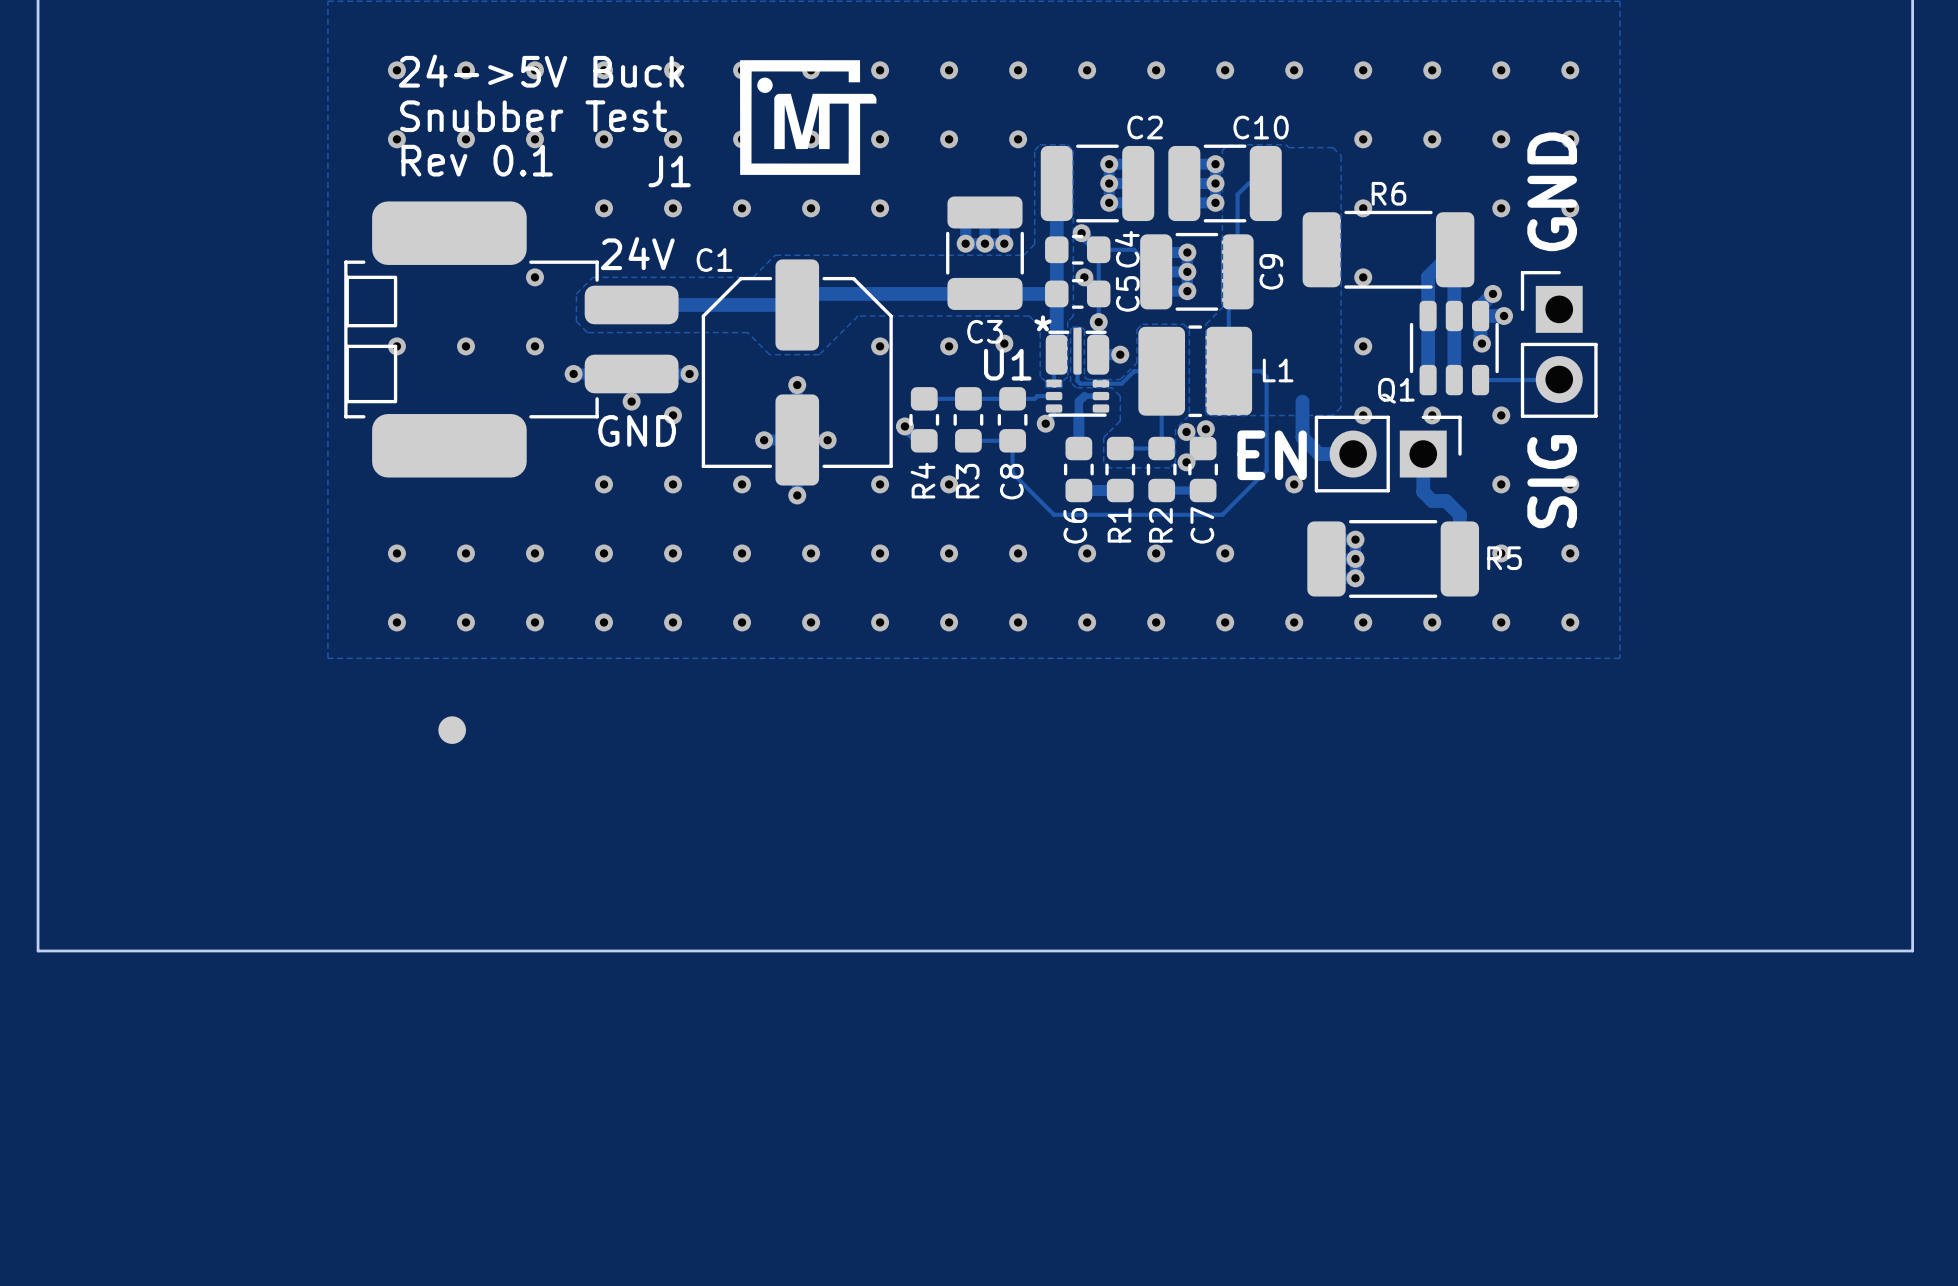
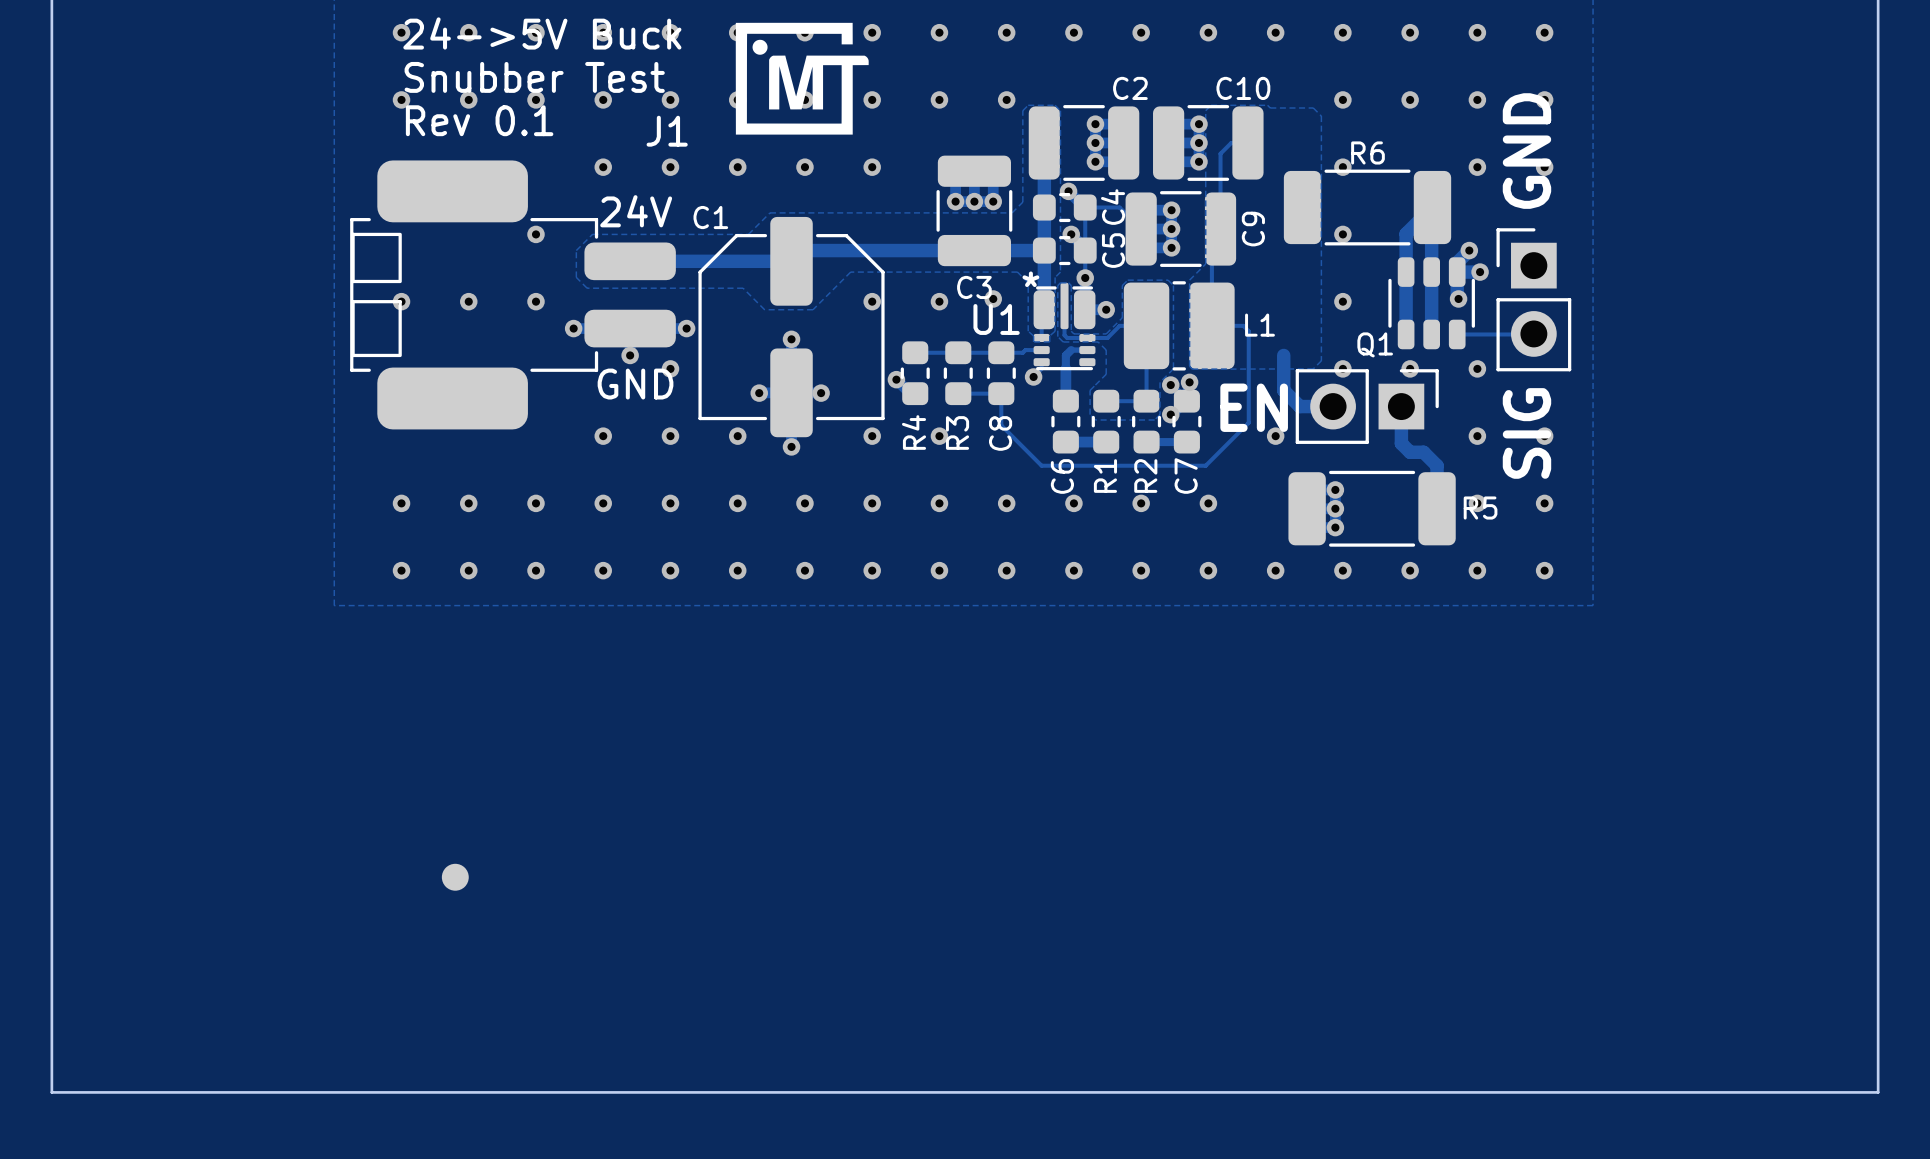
part position: (452, 730) -> (455, 877)
board edge: (38, 950) (1912, 950) -> (51, 890) (51, 1092) (1878, 1092) (1878, 890)

